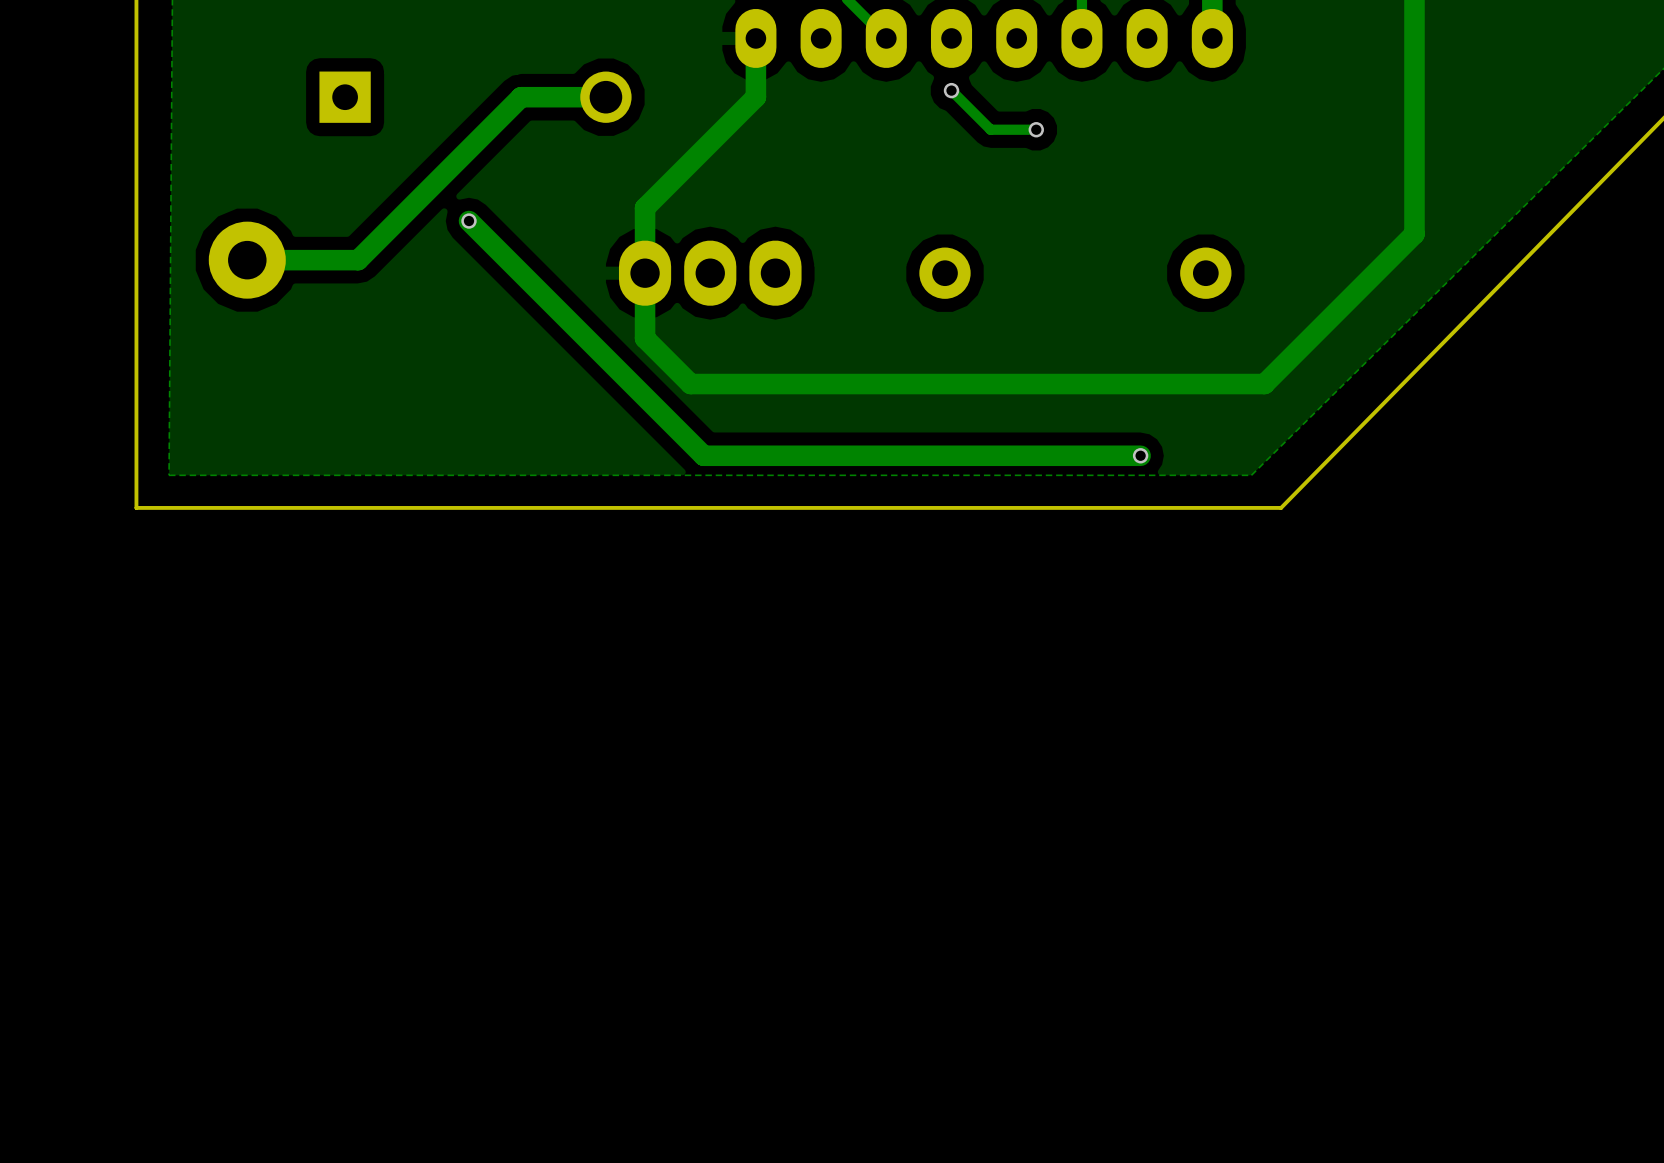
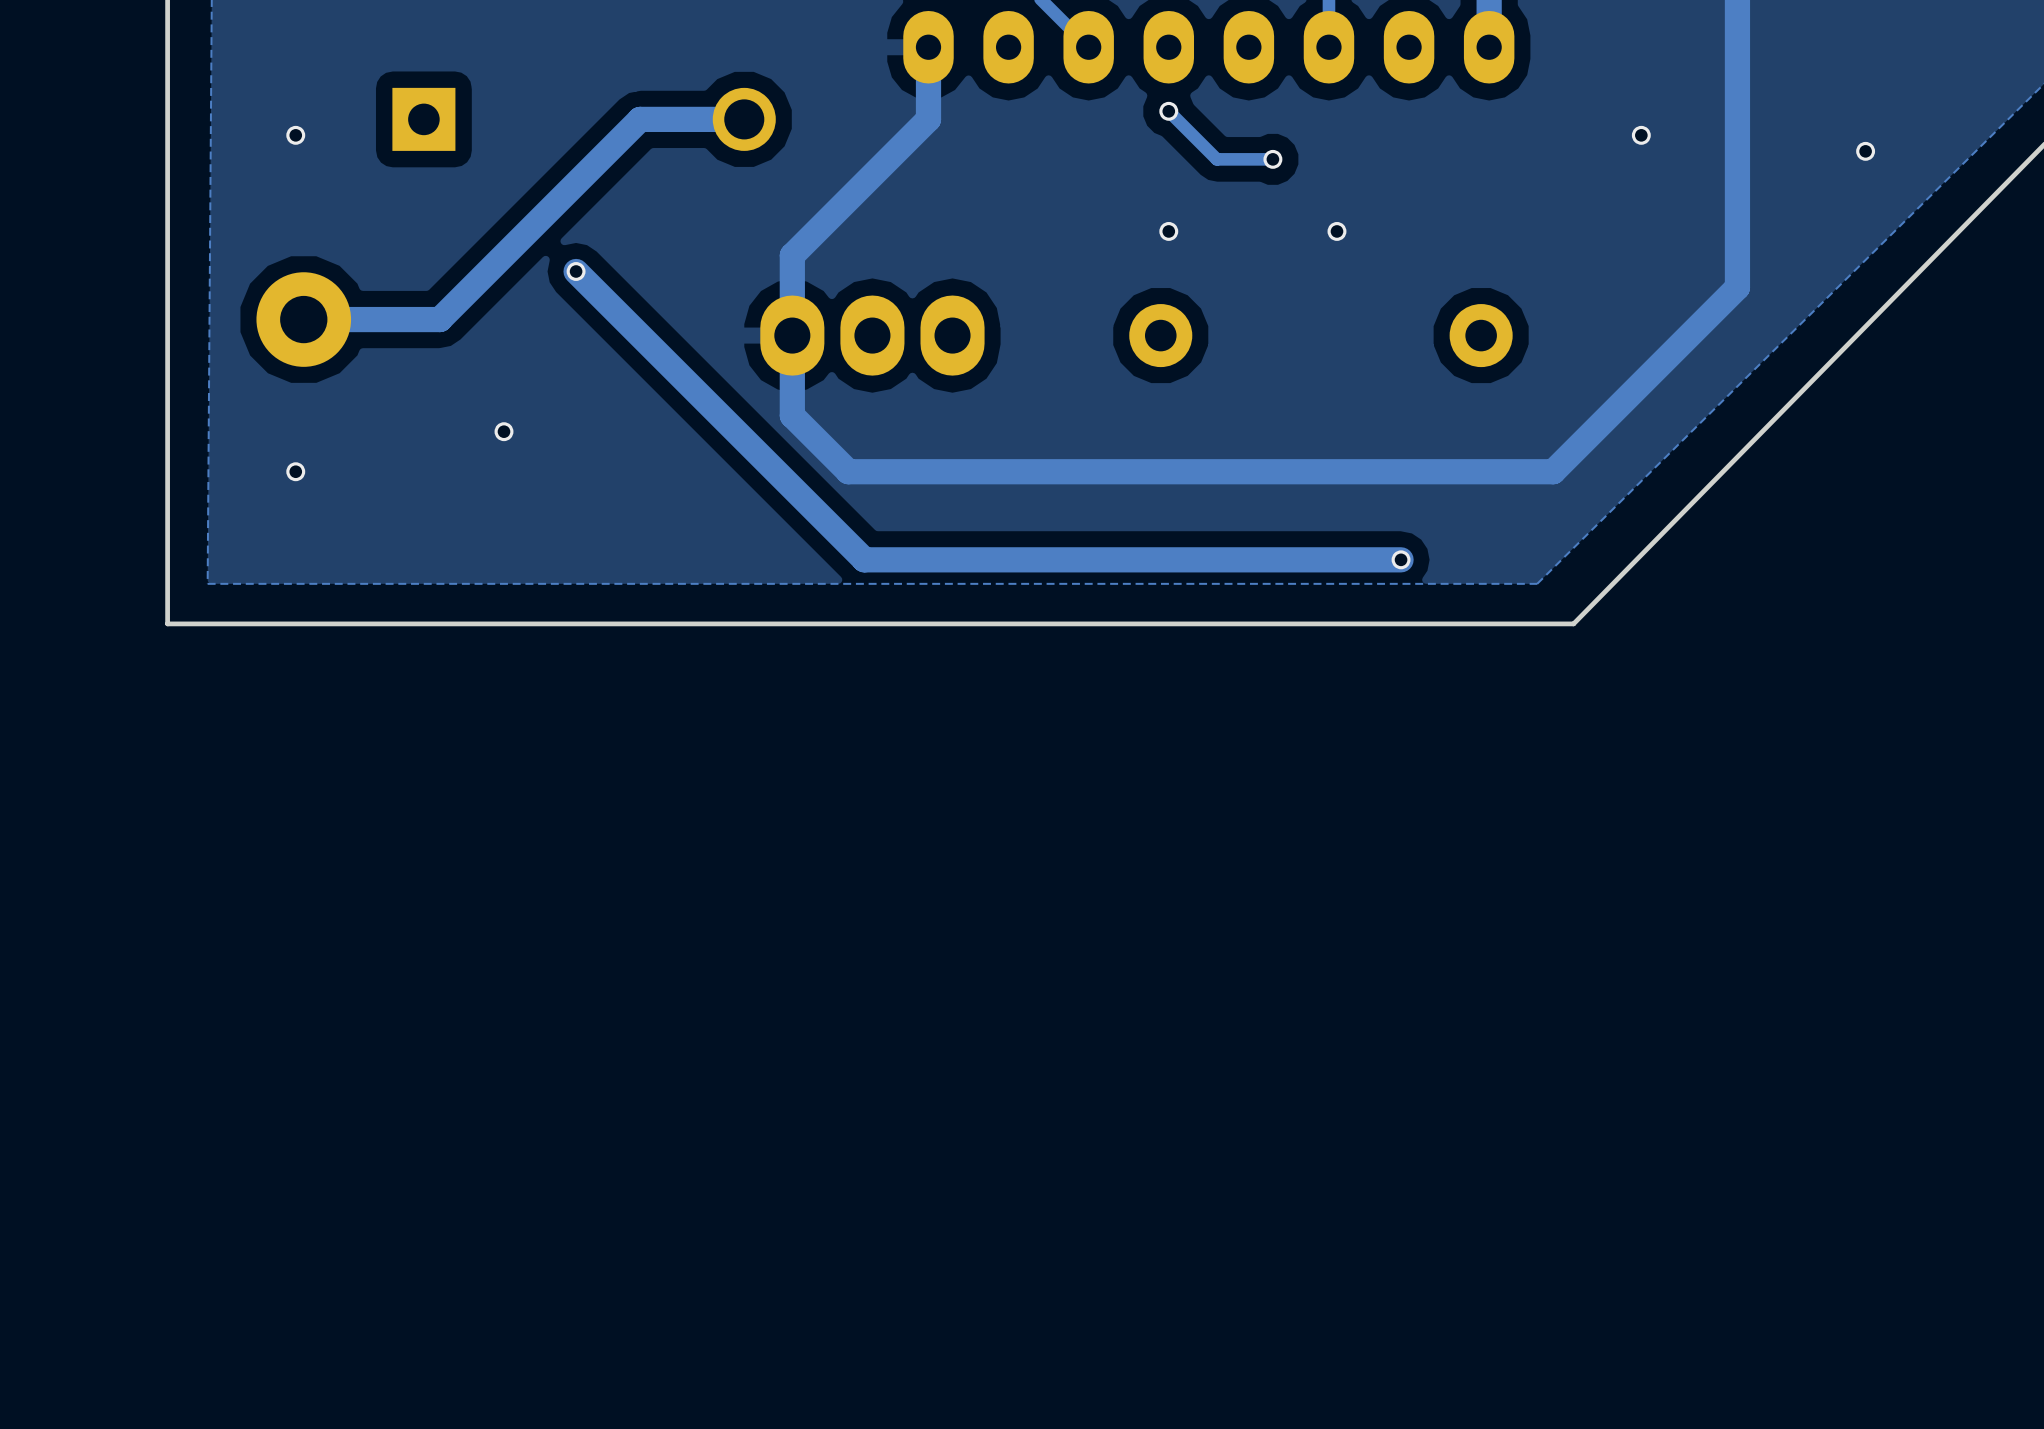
via: none -> (295, 135)
via: none -> (1641, 135)
via: none -> (1865, 151)
via: none -> (1168, 231)
via: none -> (1336, 231)
via: none -> (504, 431)
via: none -> (295, 471)

